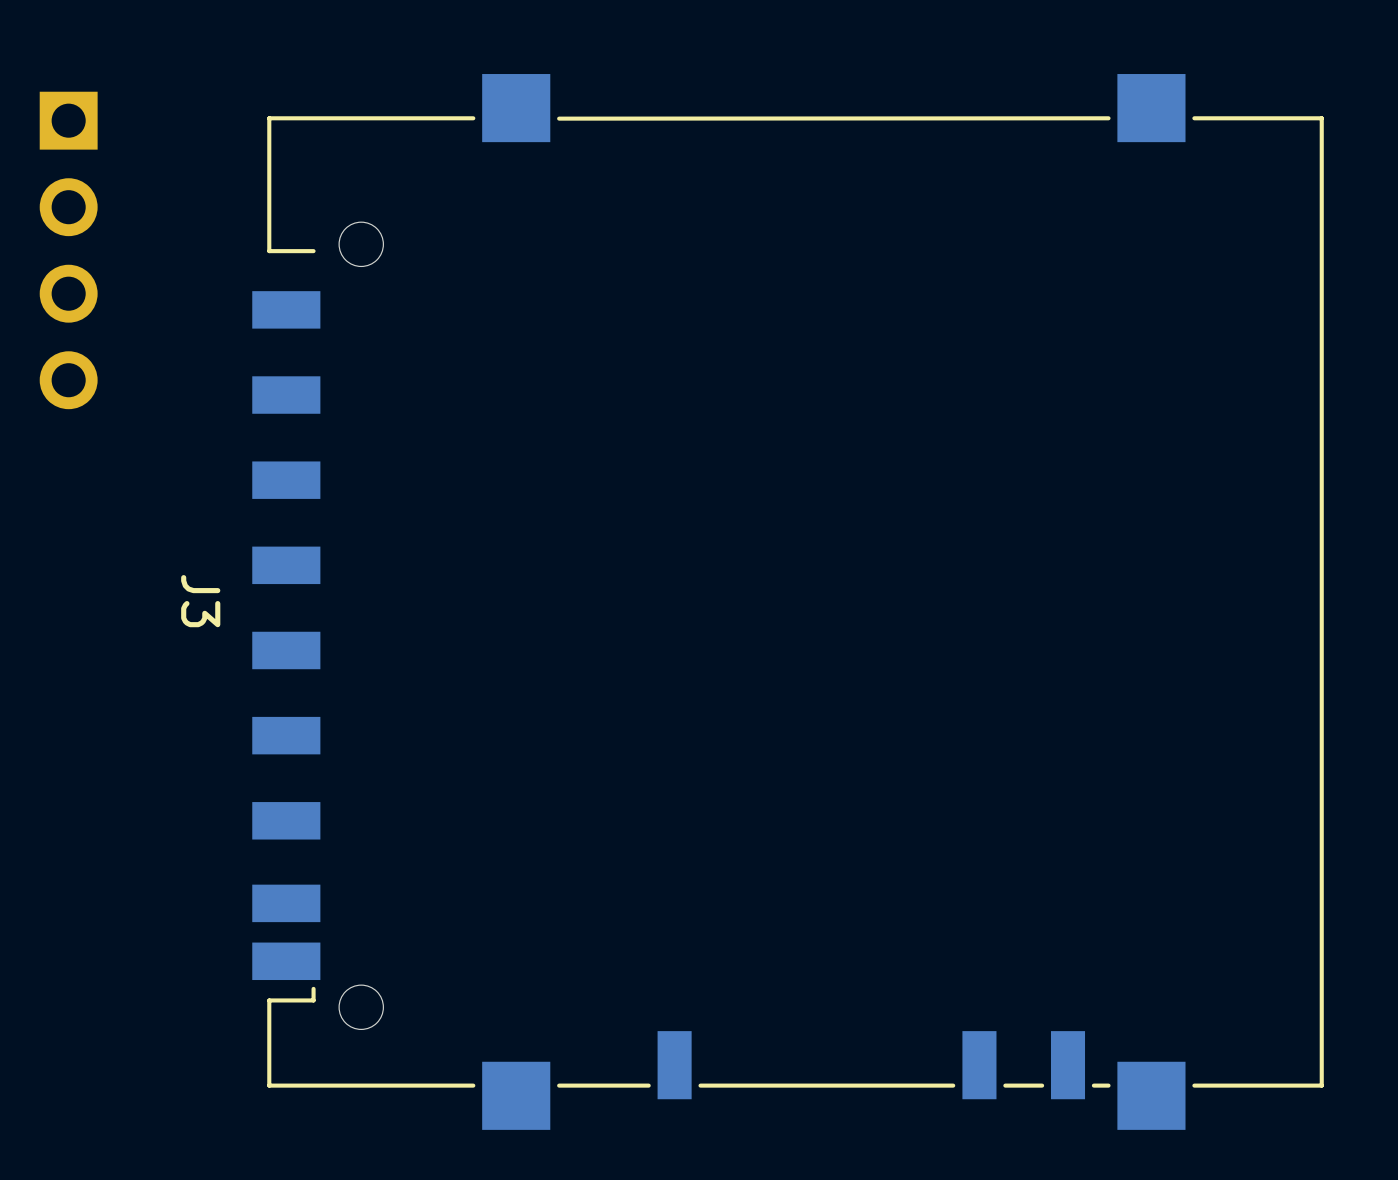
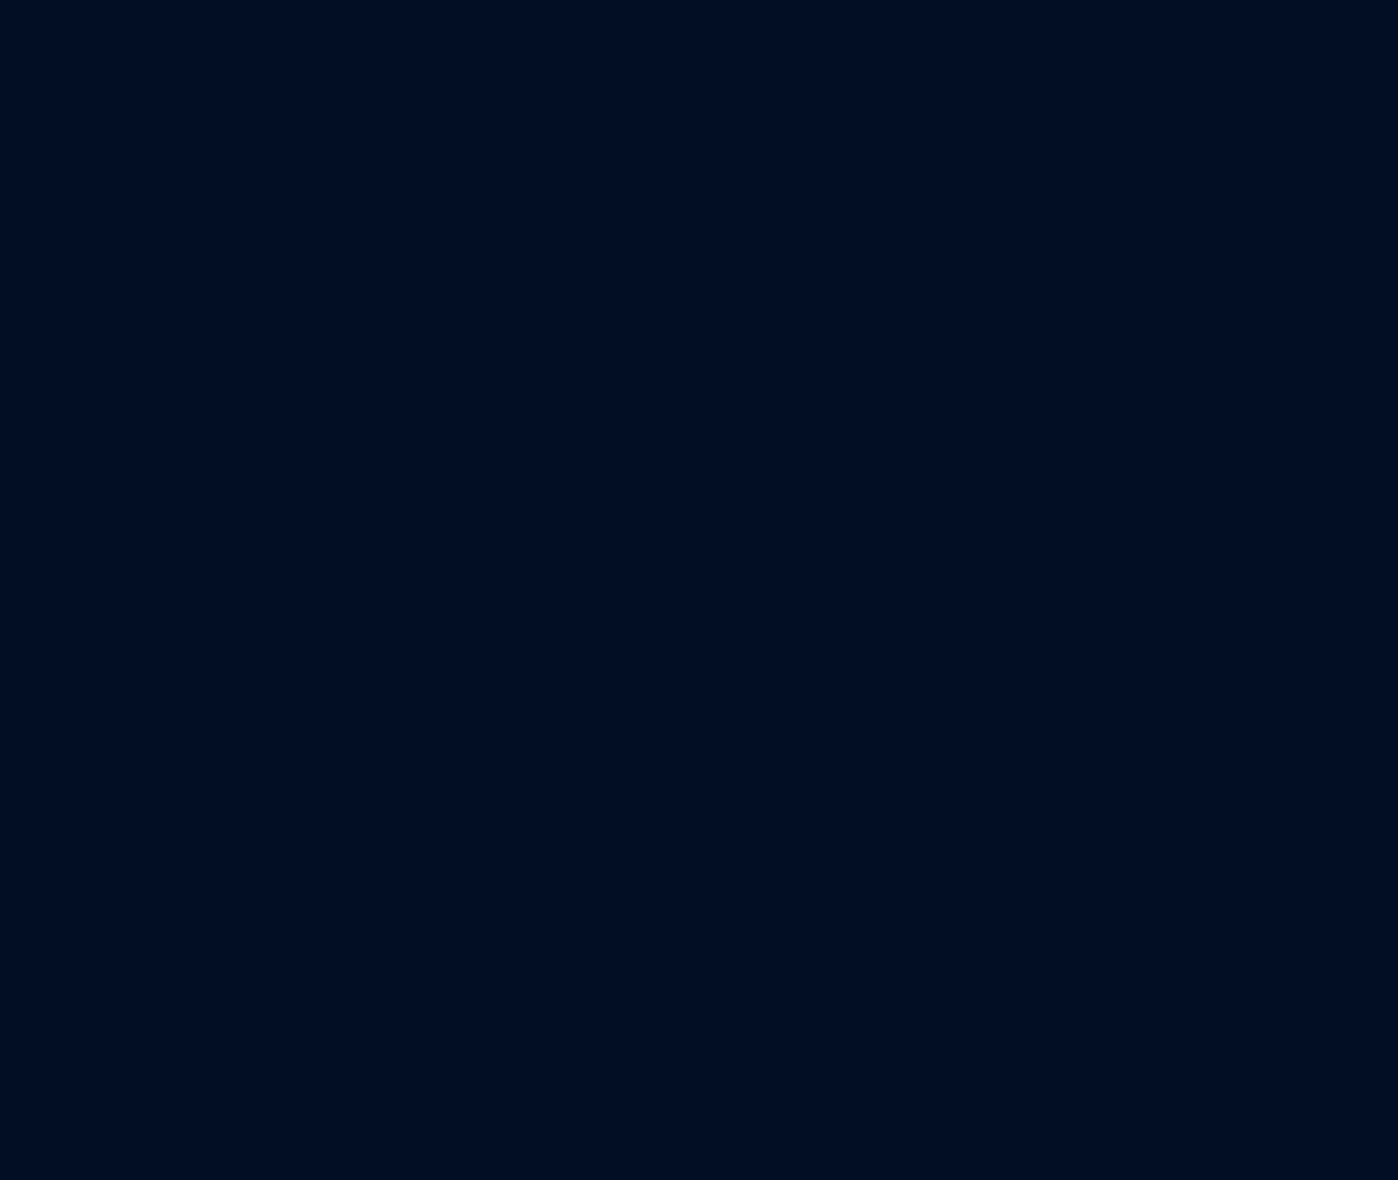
part: (68, 250) -> none
J3: (788, 601) -> none

